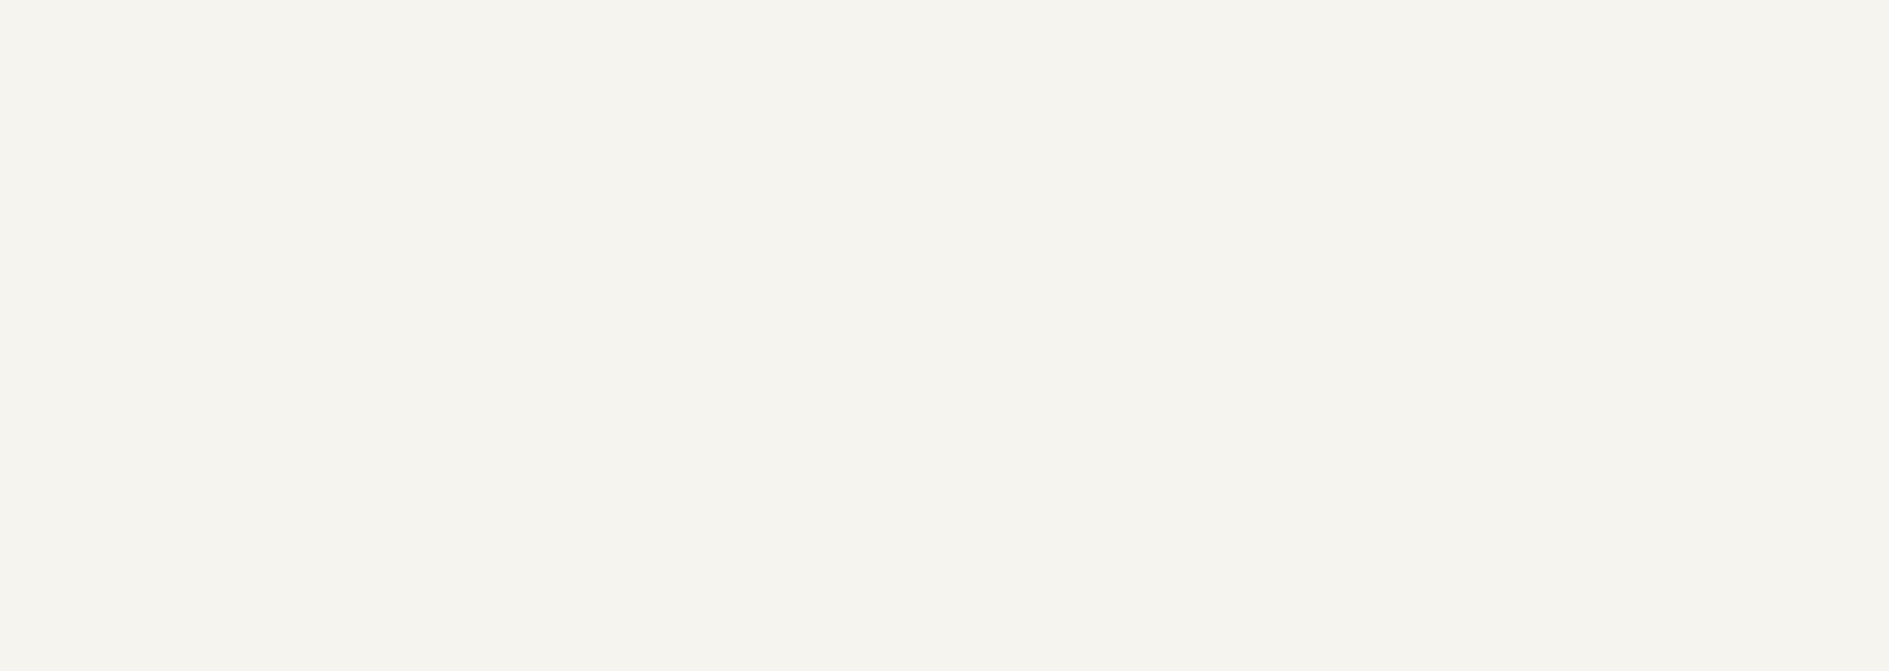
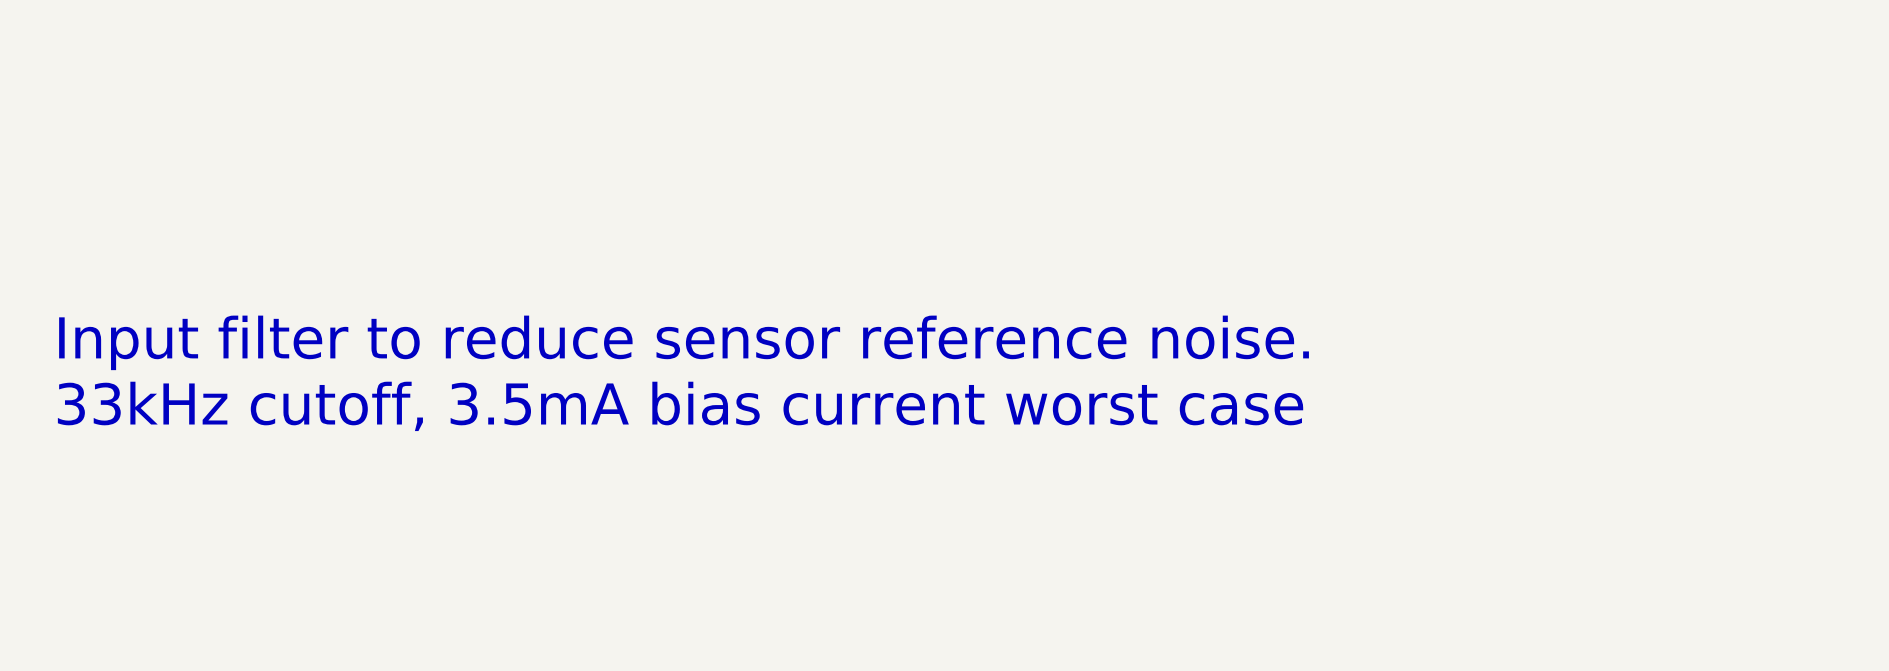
text: none -> Input filter to reduce sensor reference noise. (684, 342)
text: none -> 33kHz cutoff, 3.5mA bias current worst case (680, 406)

